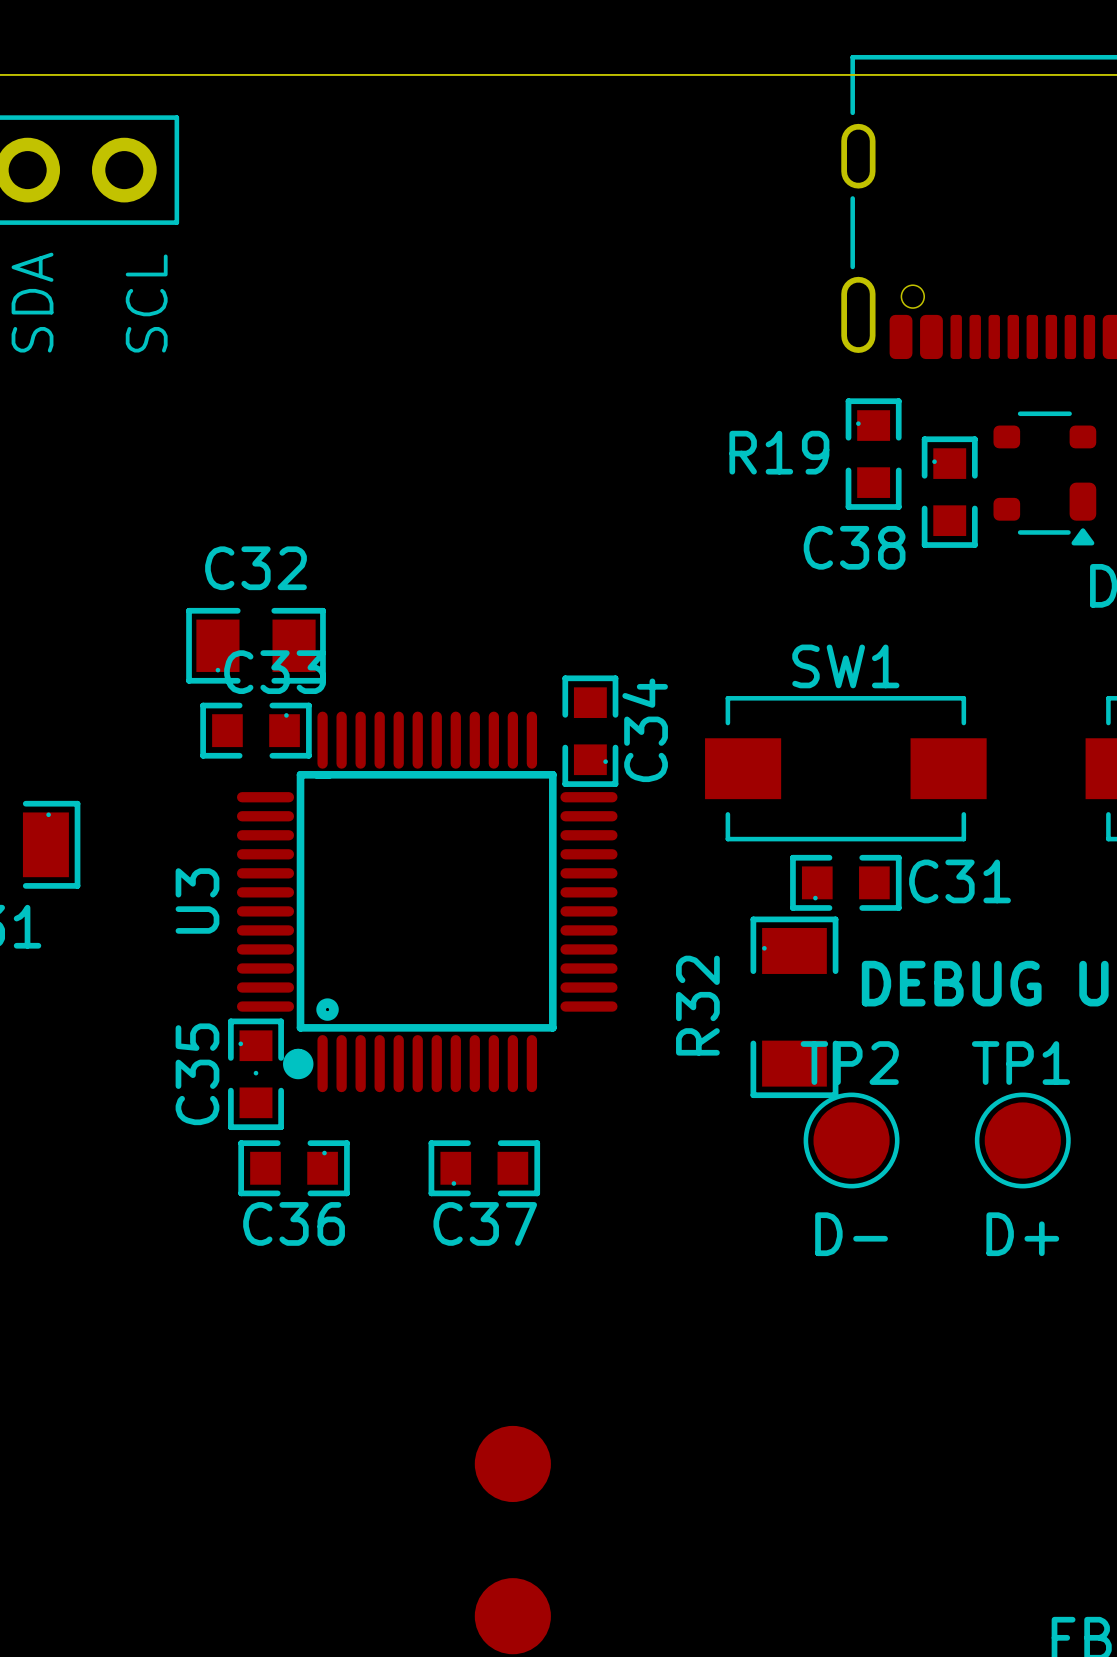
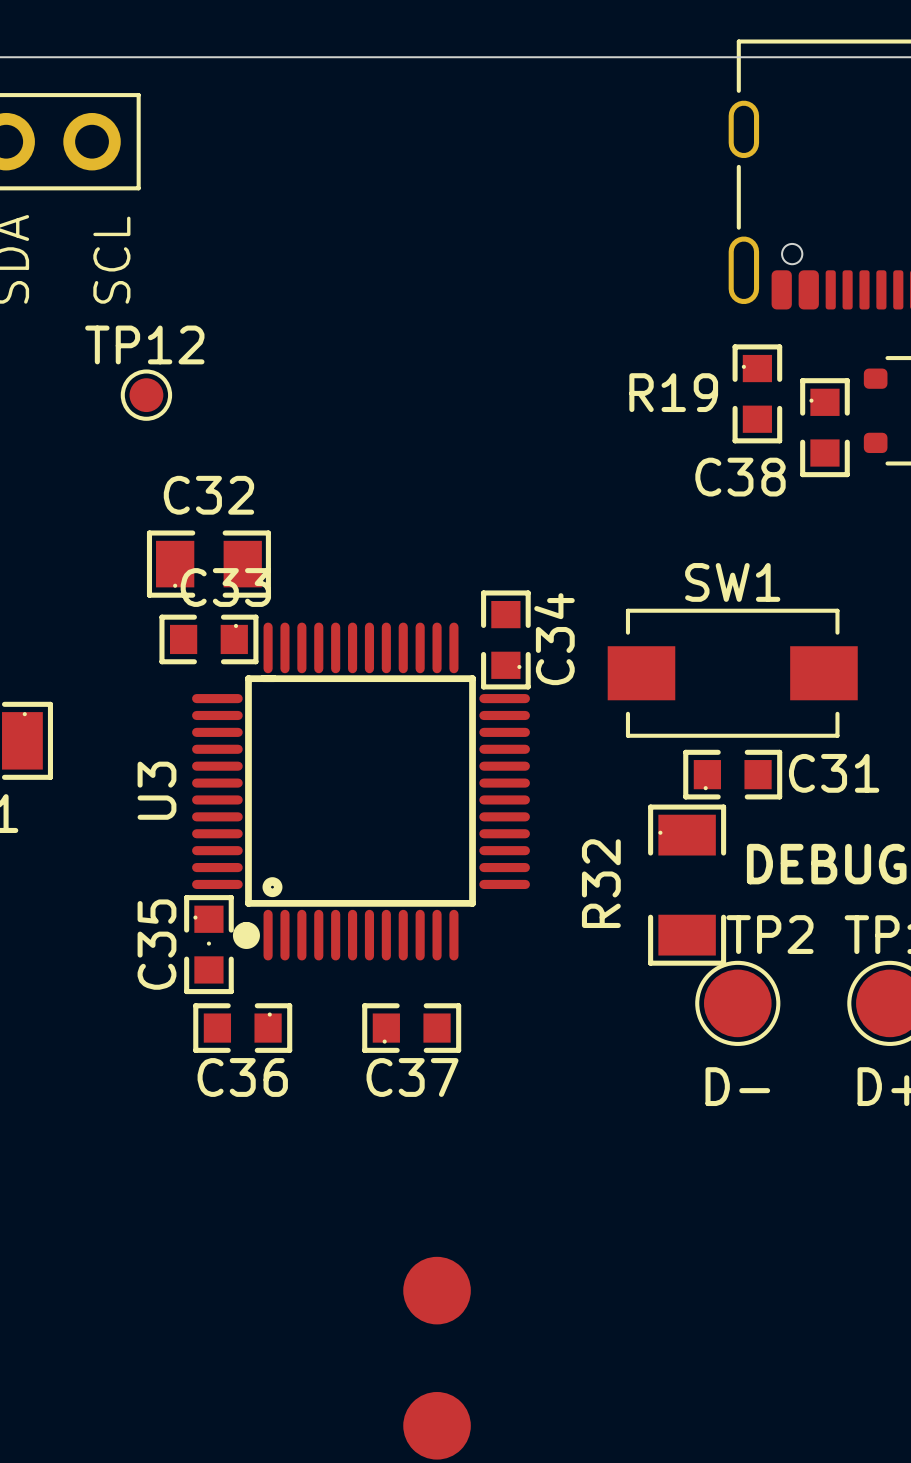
TP12: none -> (146, 395)
TP2 name position: TP2 (849, 1063) -> TP2 (769, 934)

